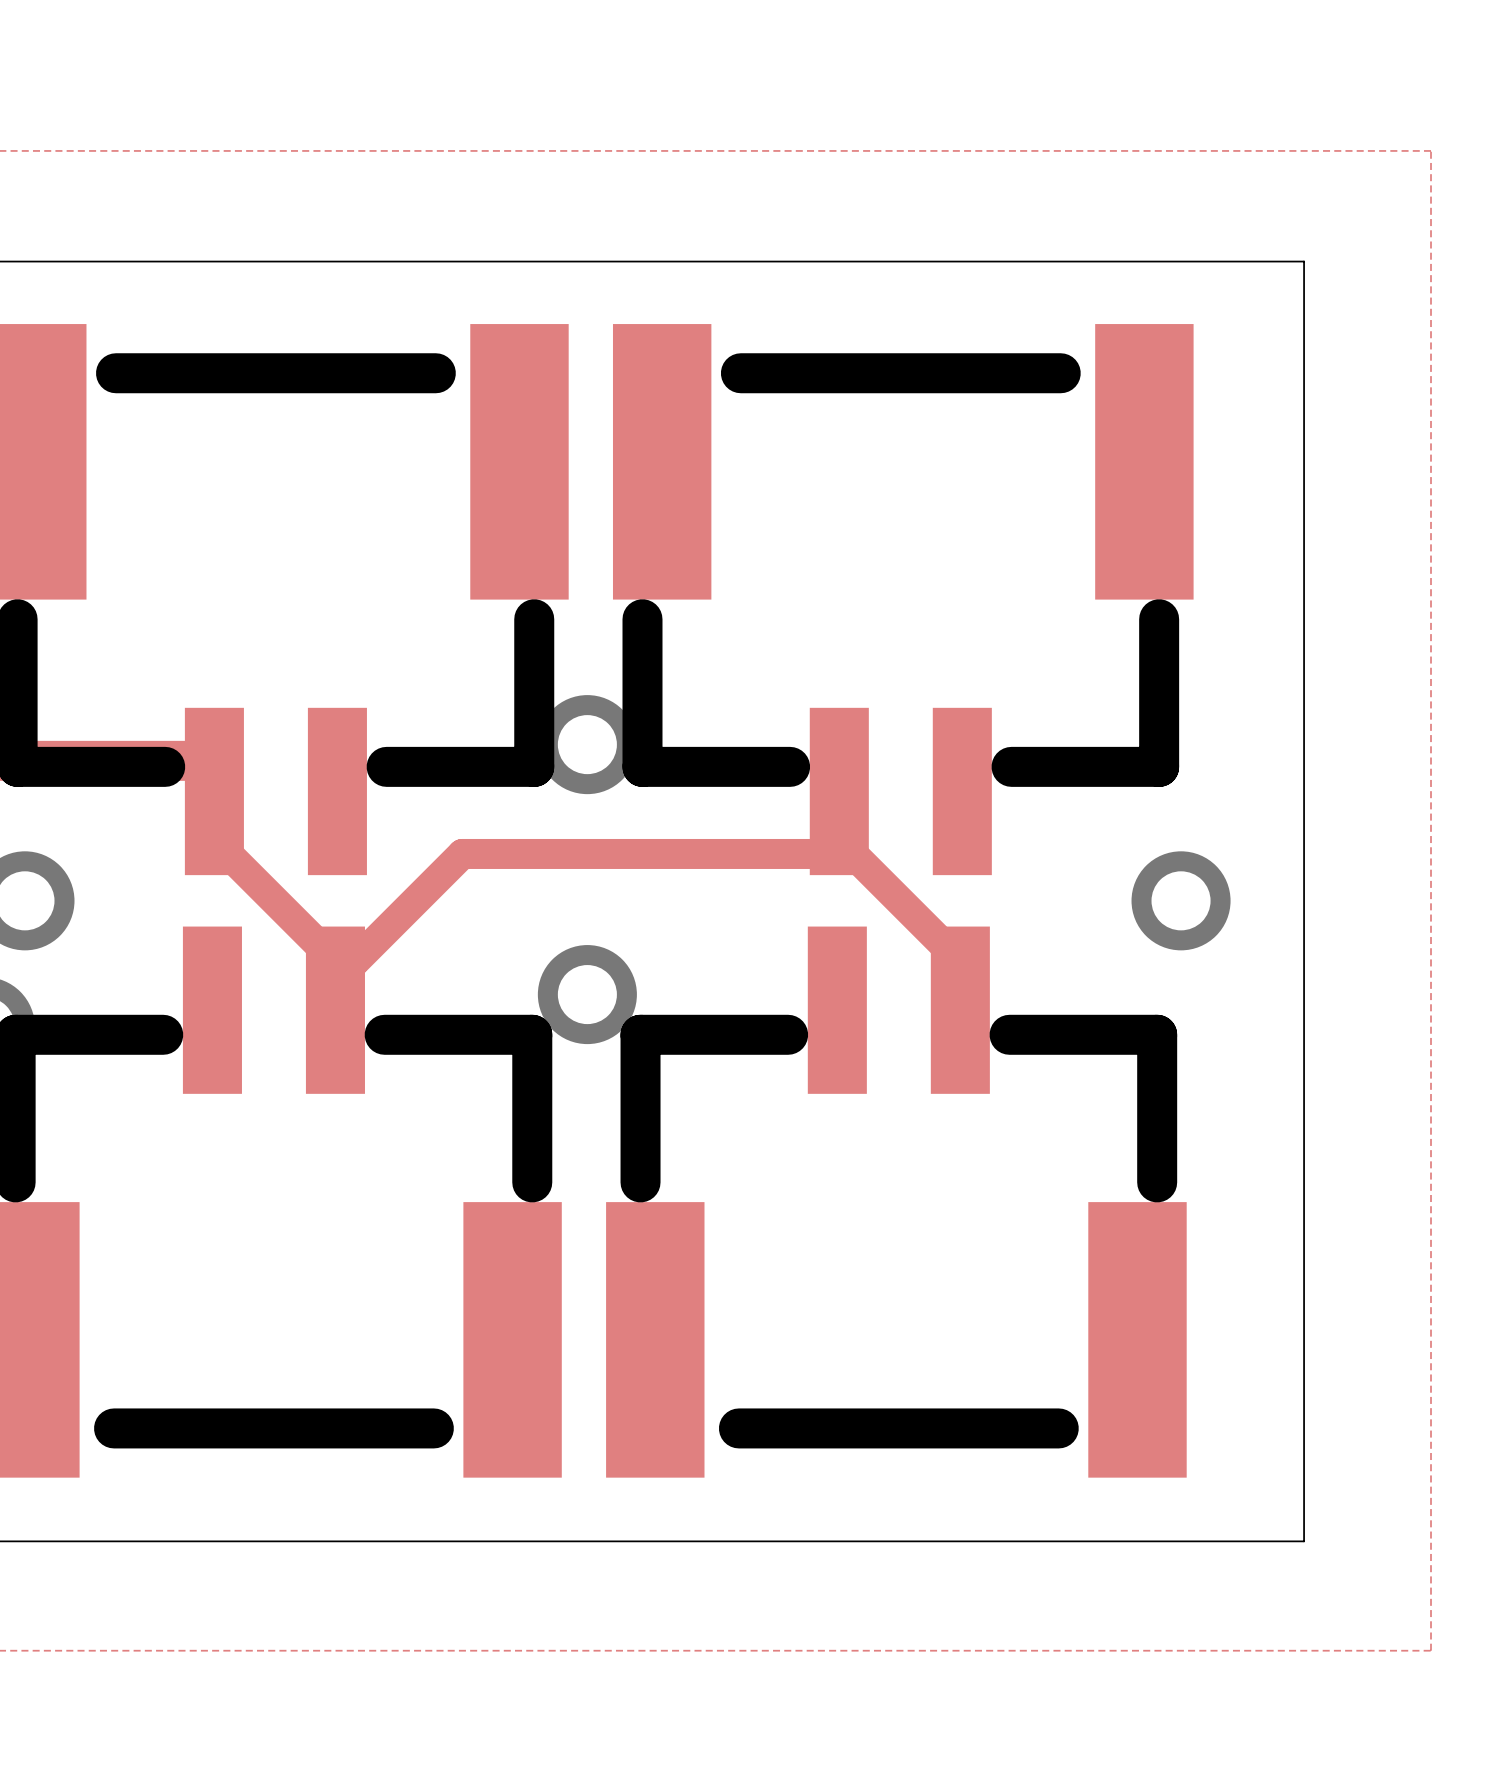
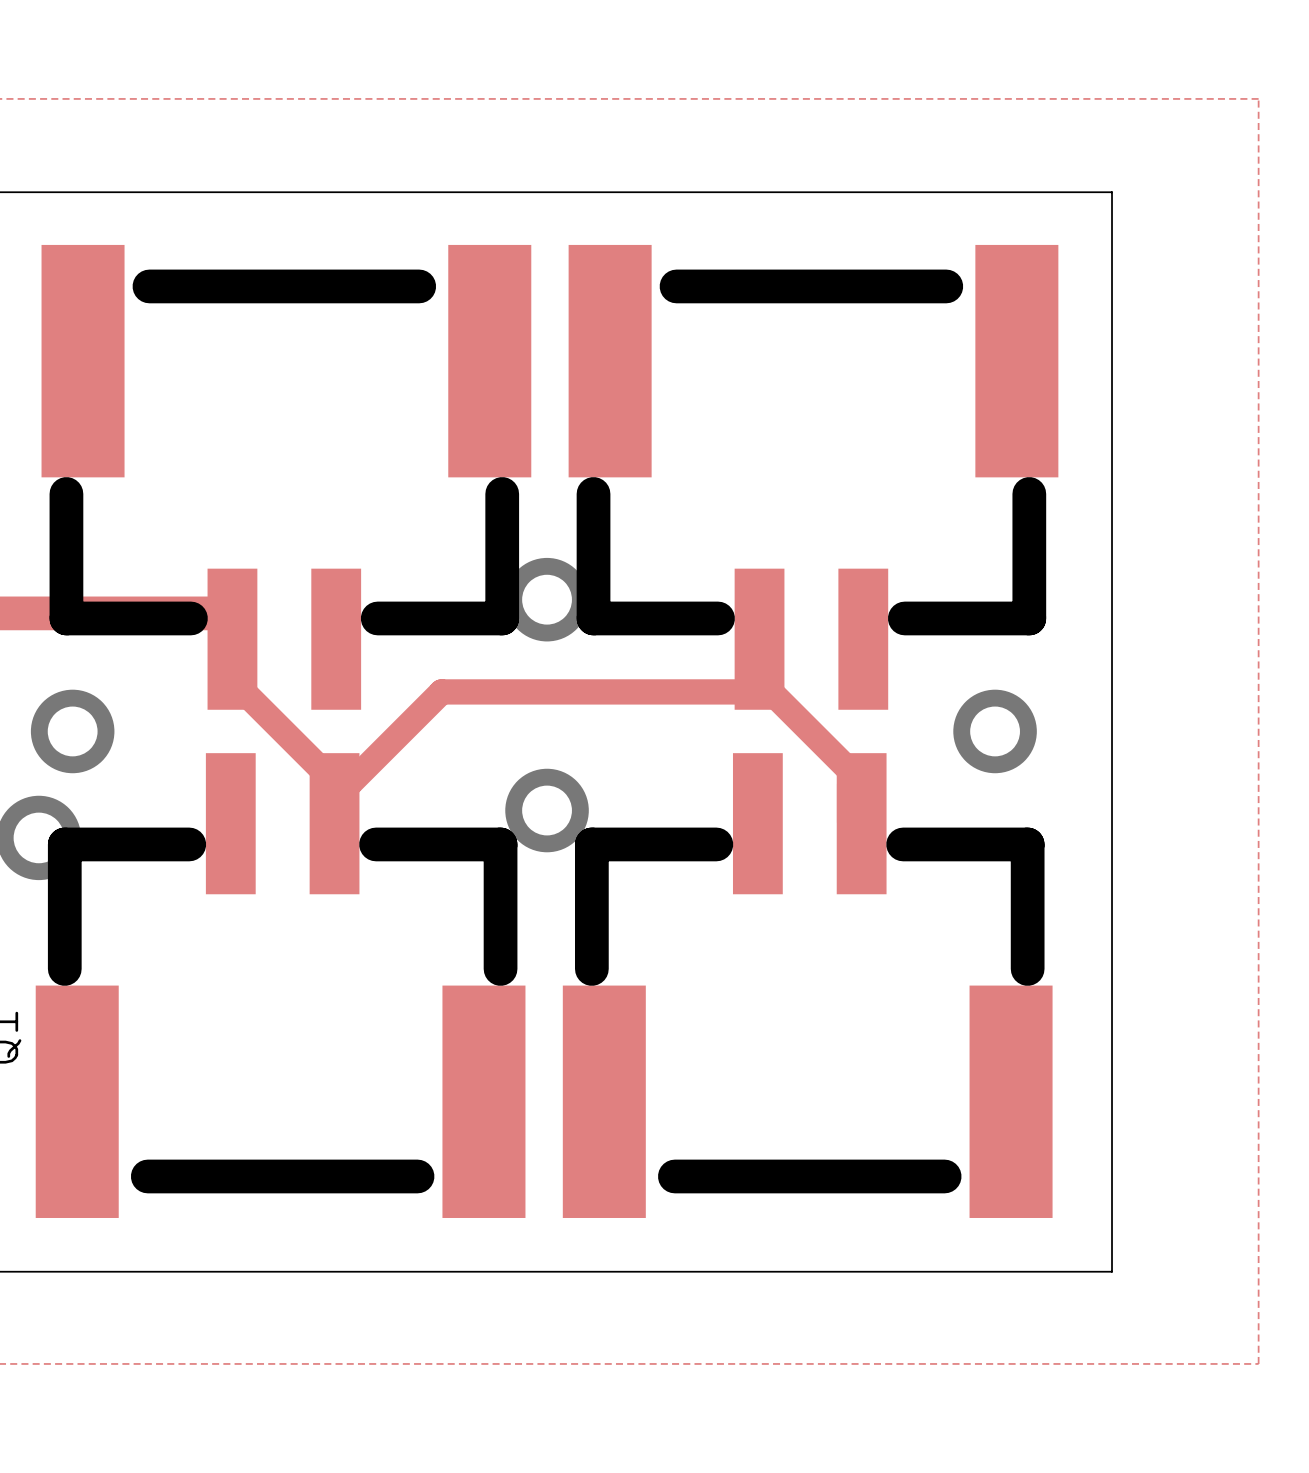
board edge: (1257, 261) (1304, 261) (1304, 1541) (1257, 1541) -> (1112, 192) (1112, 1271)
via position: (1181, 900) -> (995, 731)

